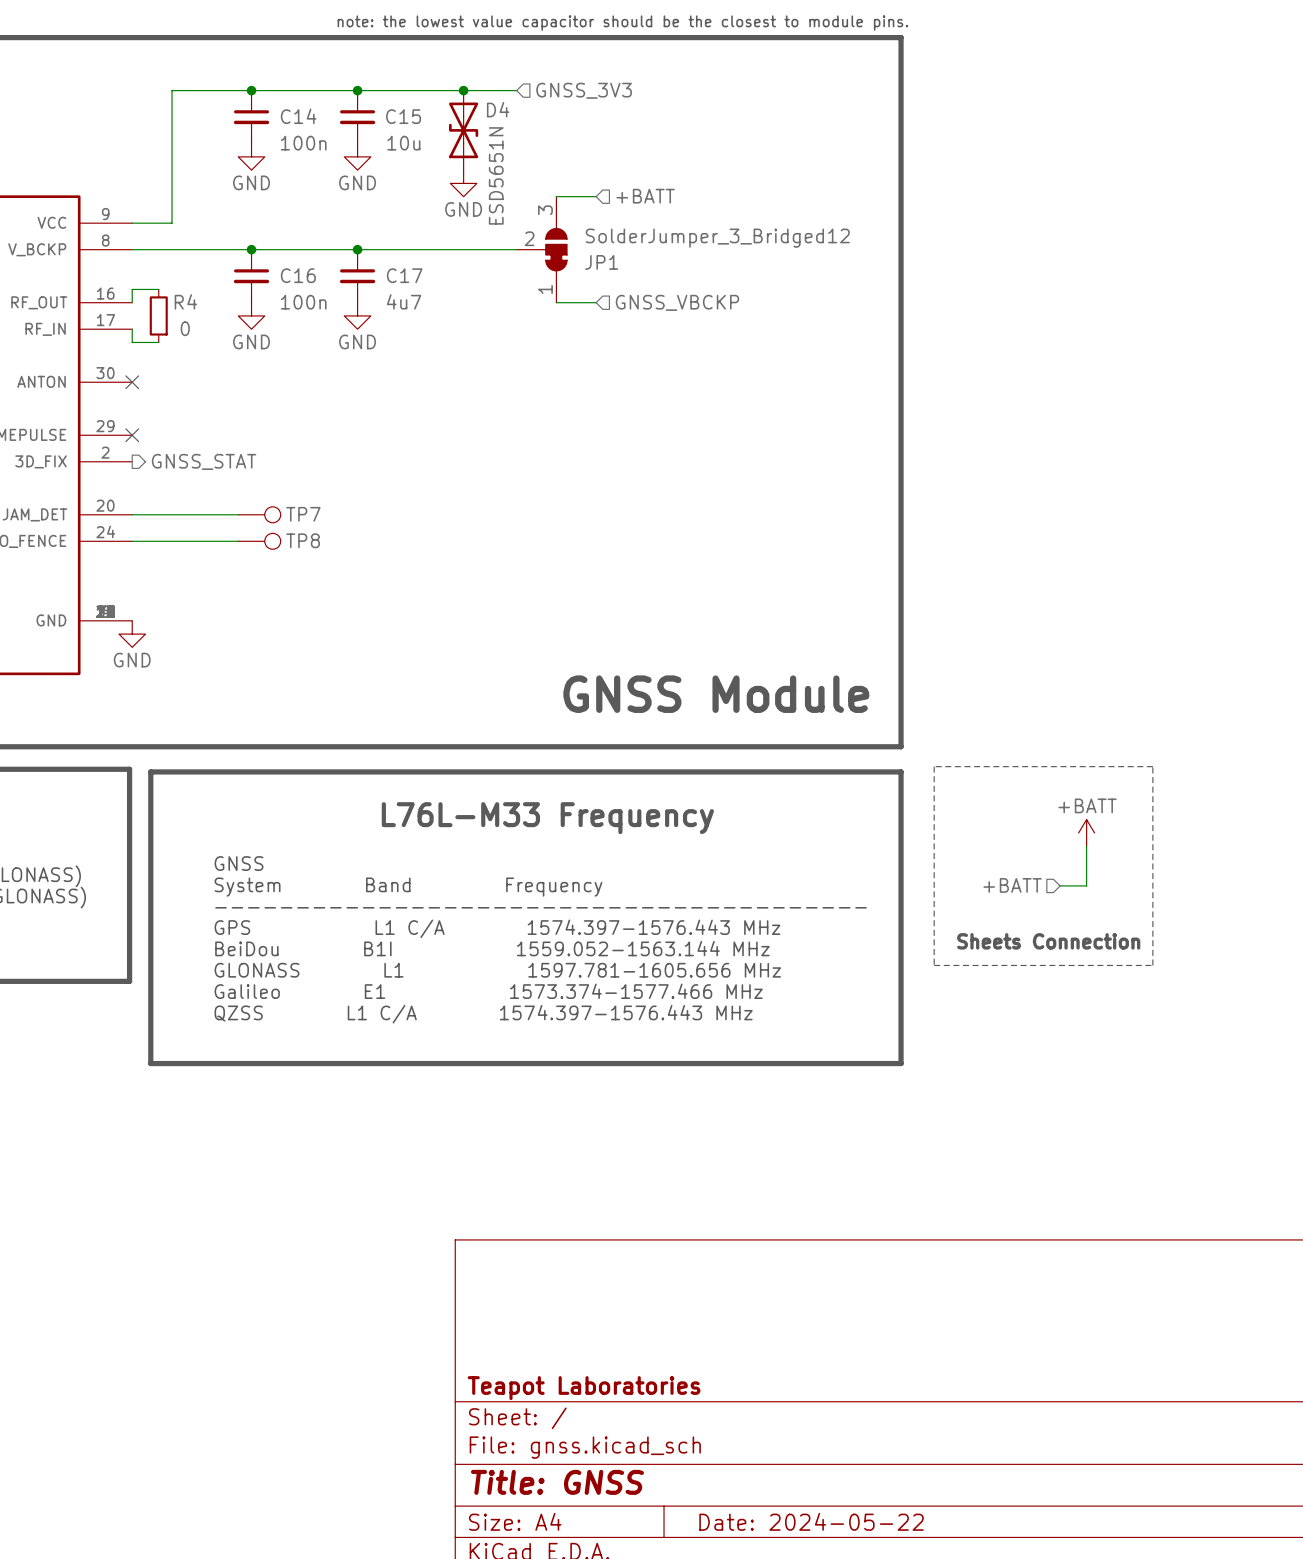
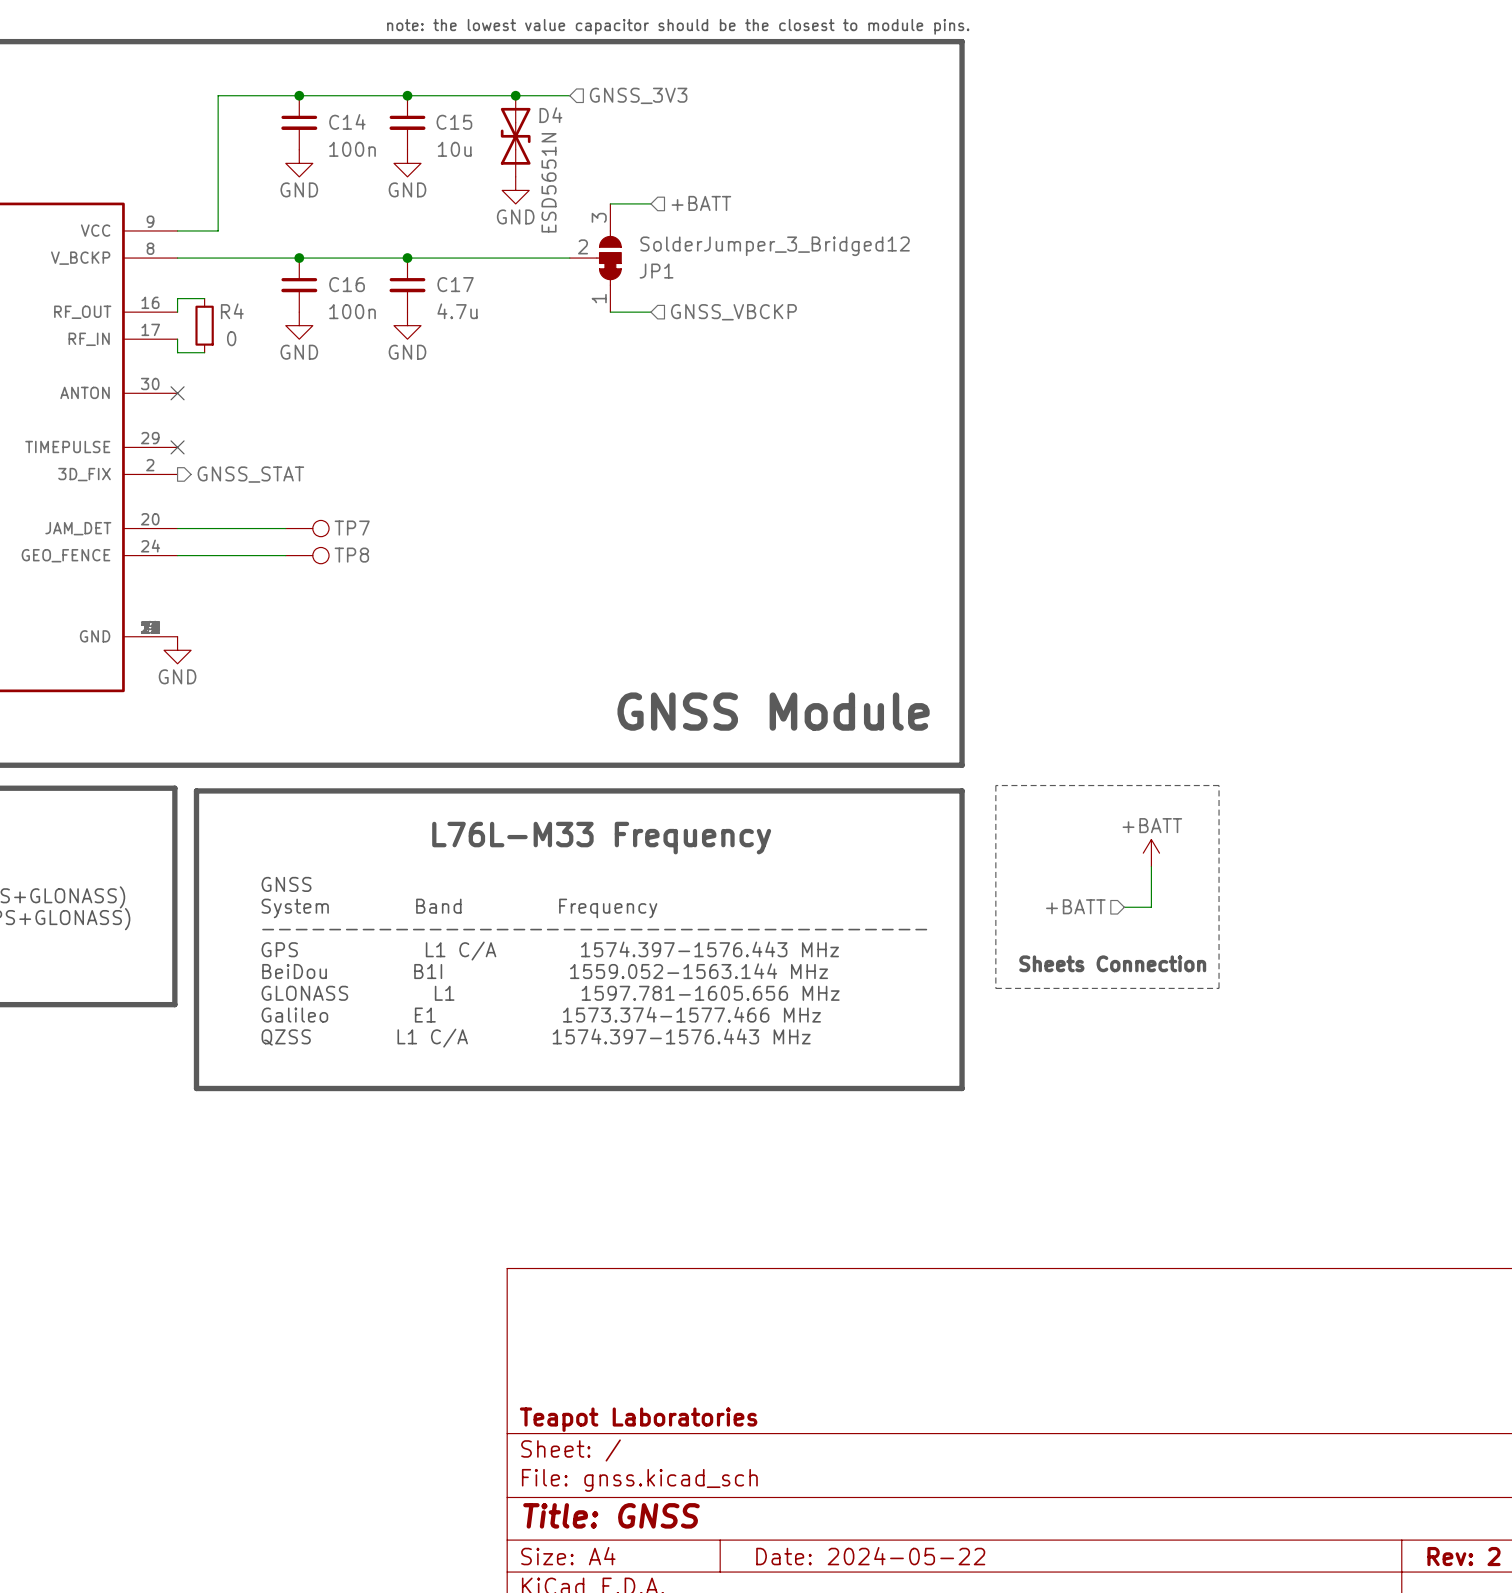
C17 value: 4u7 (404, 301) -> 4.7u (457, 311)

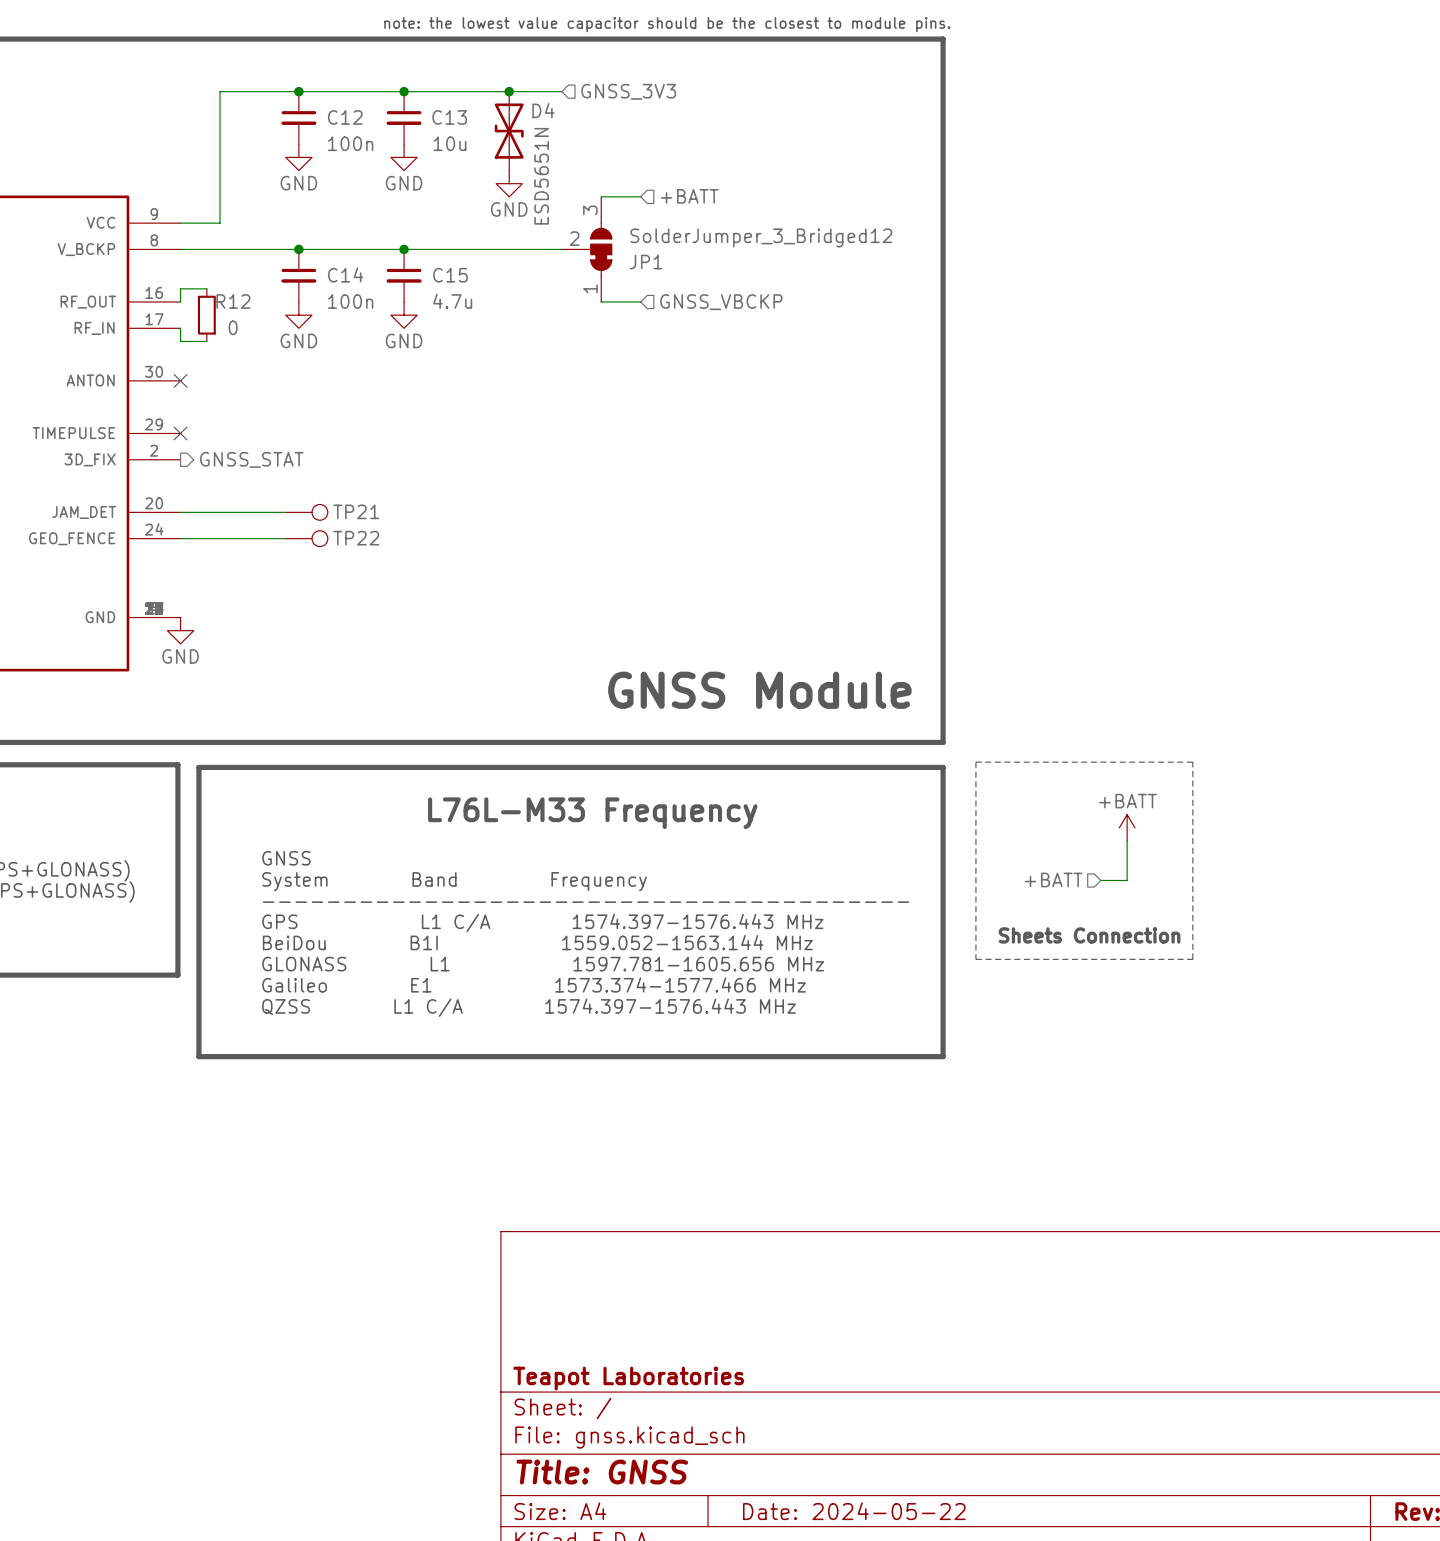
C14 name: C14 (347, 121) -> C12 (345, 117)
C15 name: C15 (454, 122) -> C13 (449, 117)
C16 name: C16 (347, 284) -> C14 (345, 274)
C17 name: C17 (455, 284) -> C15 (450, 275)
R4 name: R4 (232, 311) -> R12 (233, 301)
TP7 name: TP7 (352, 528) -> TP21 (356, 511)
TP8 name: TP8 (351, 555) -> TP22 (356, 538)

